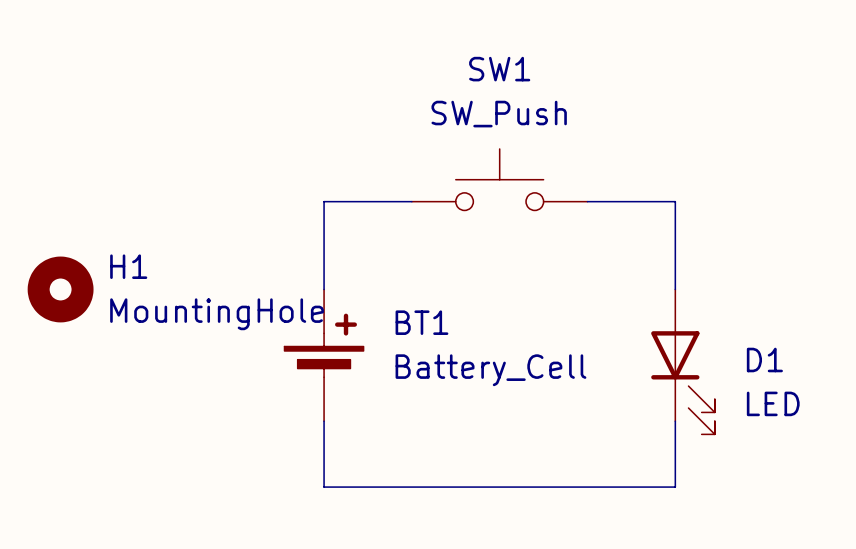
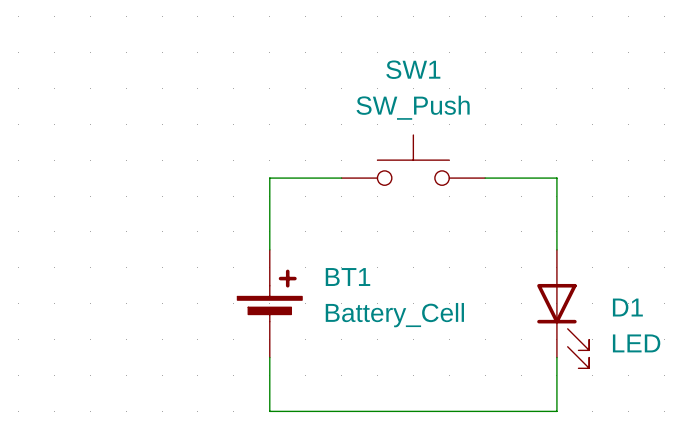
H1: MountingHole (60, 289) -> none

